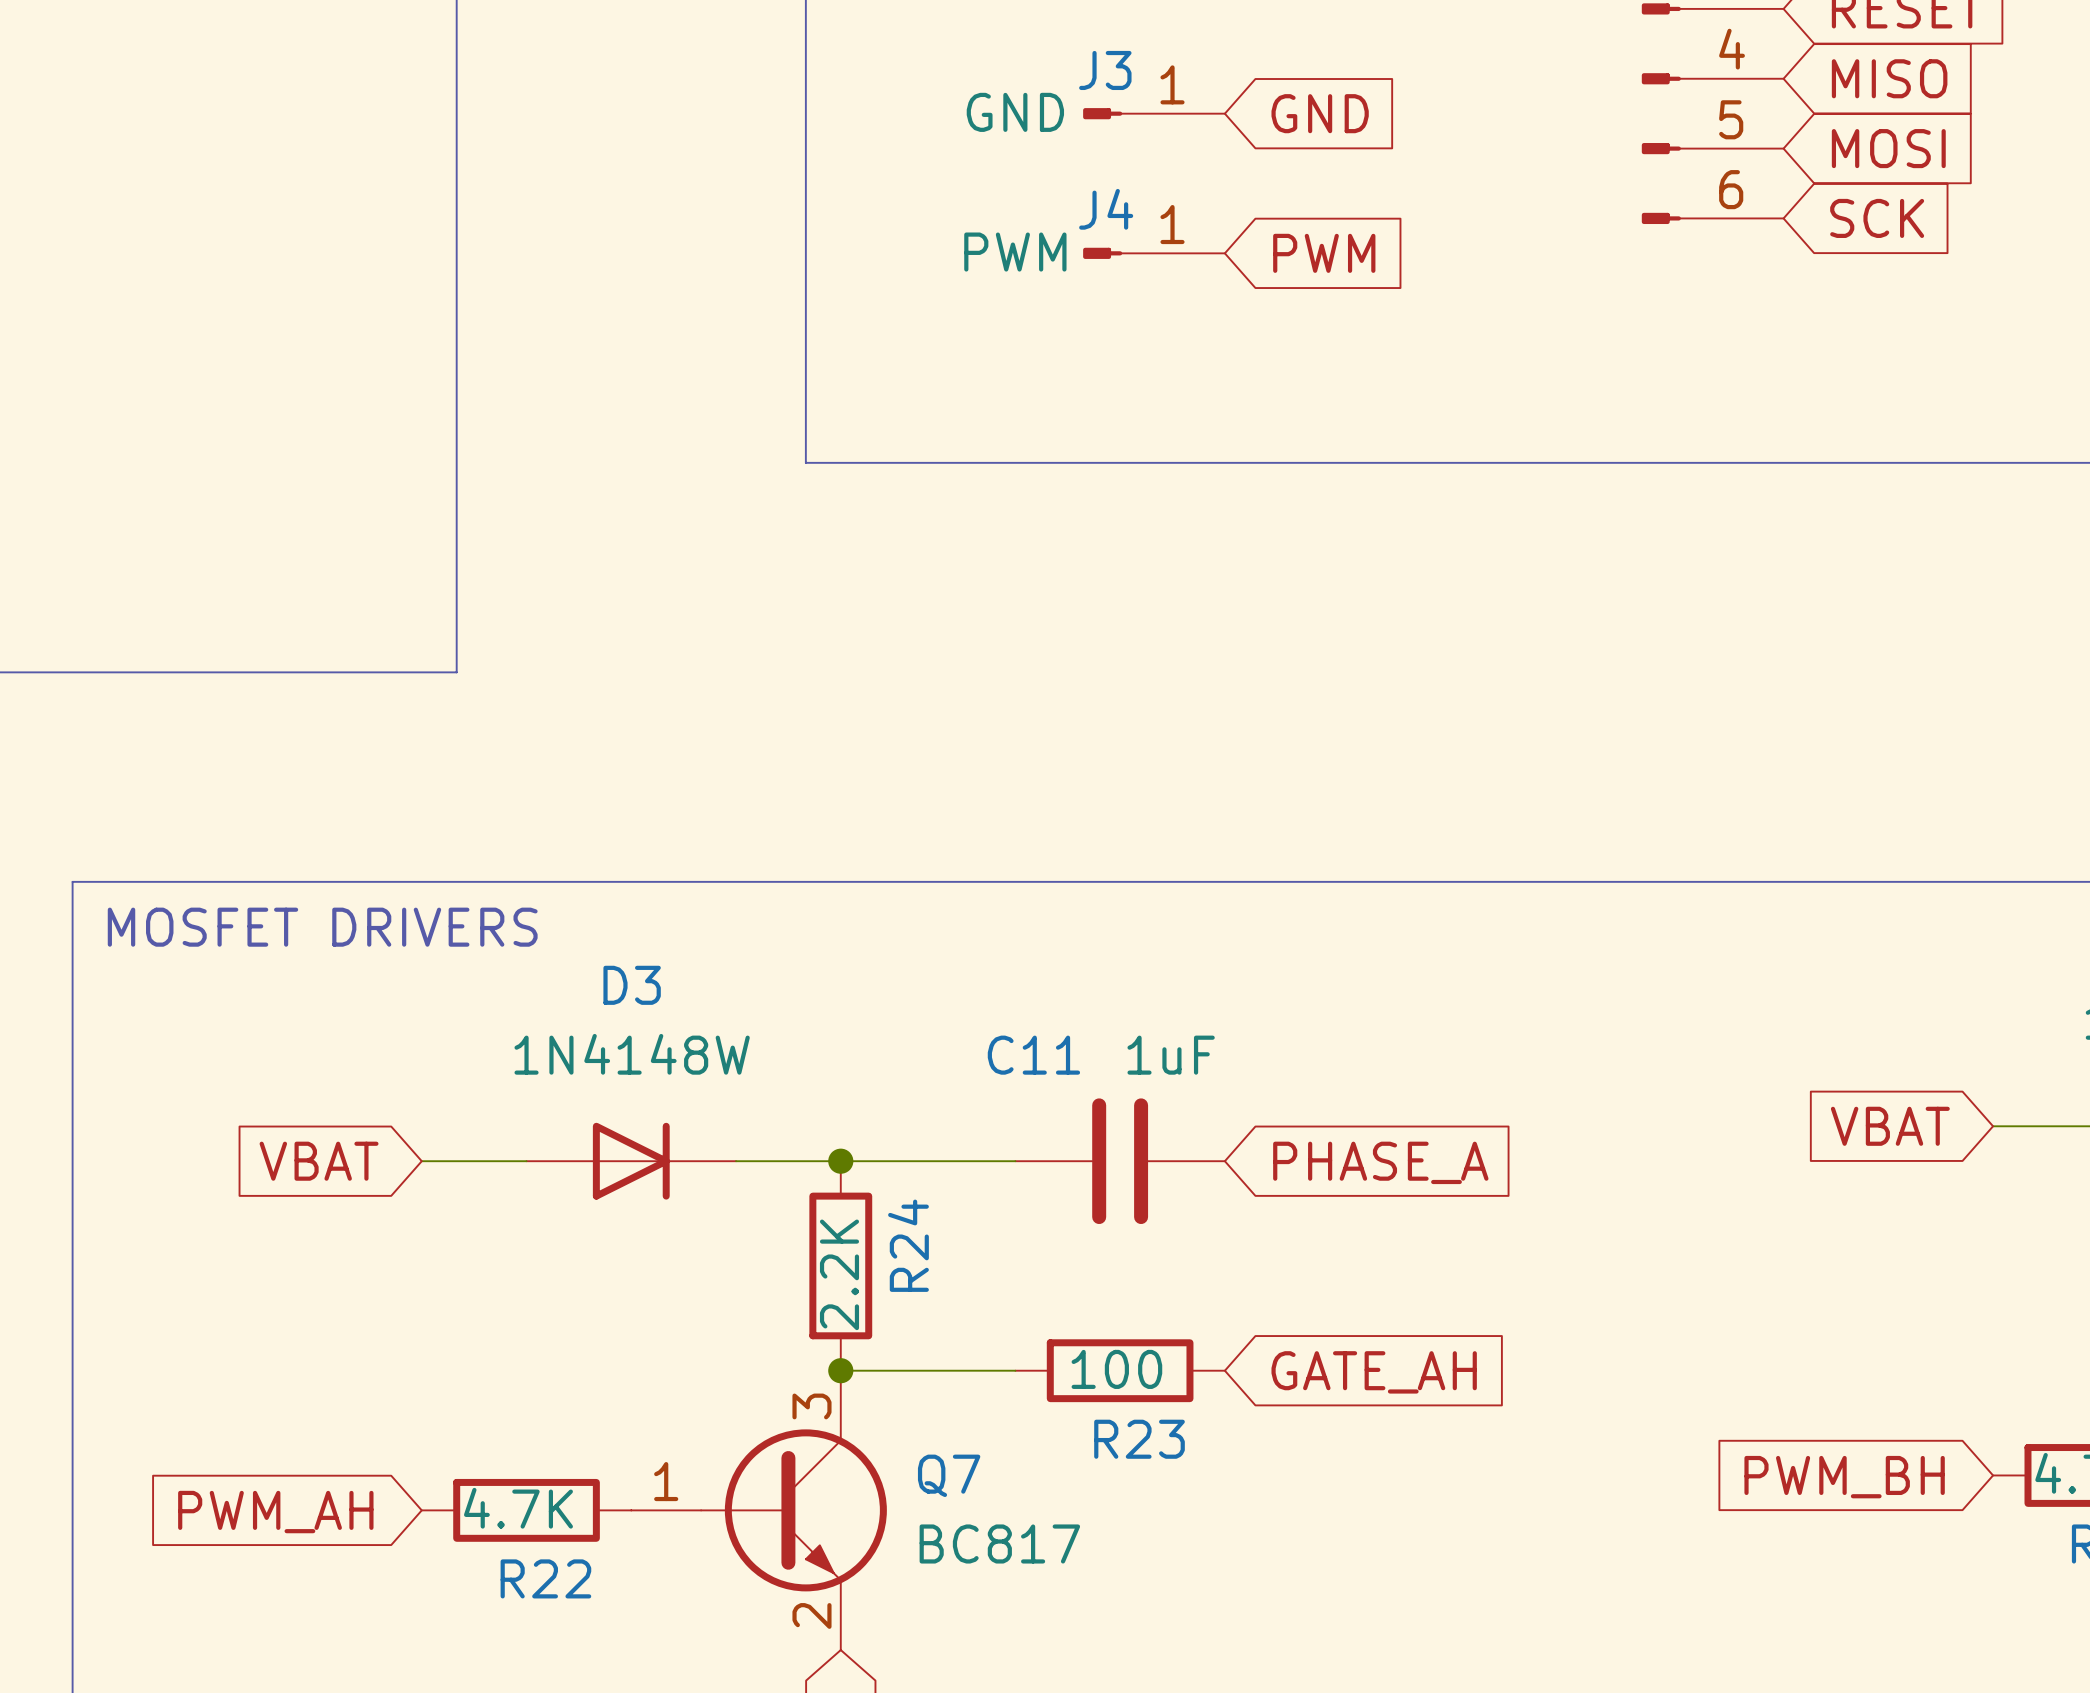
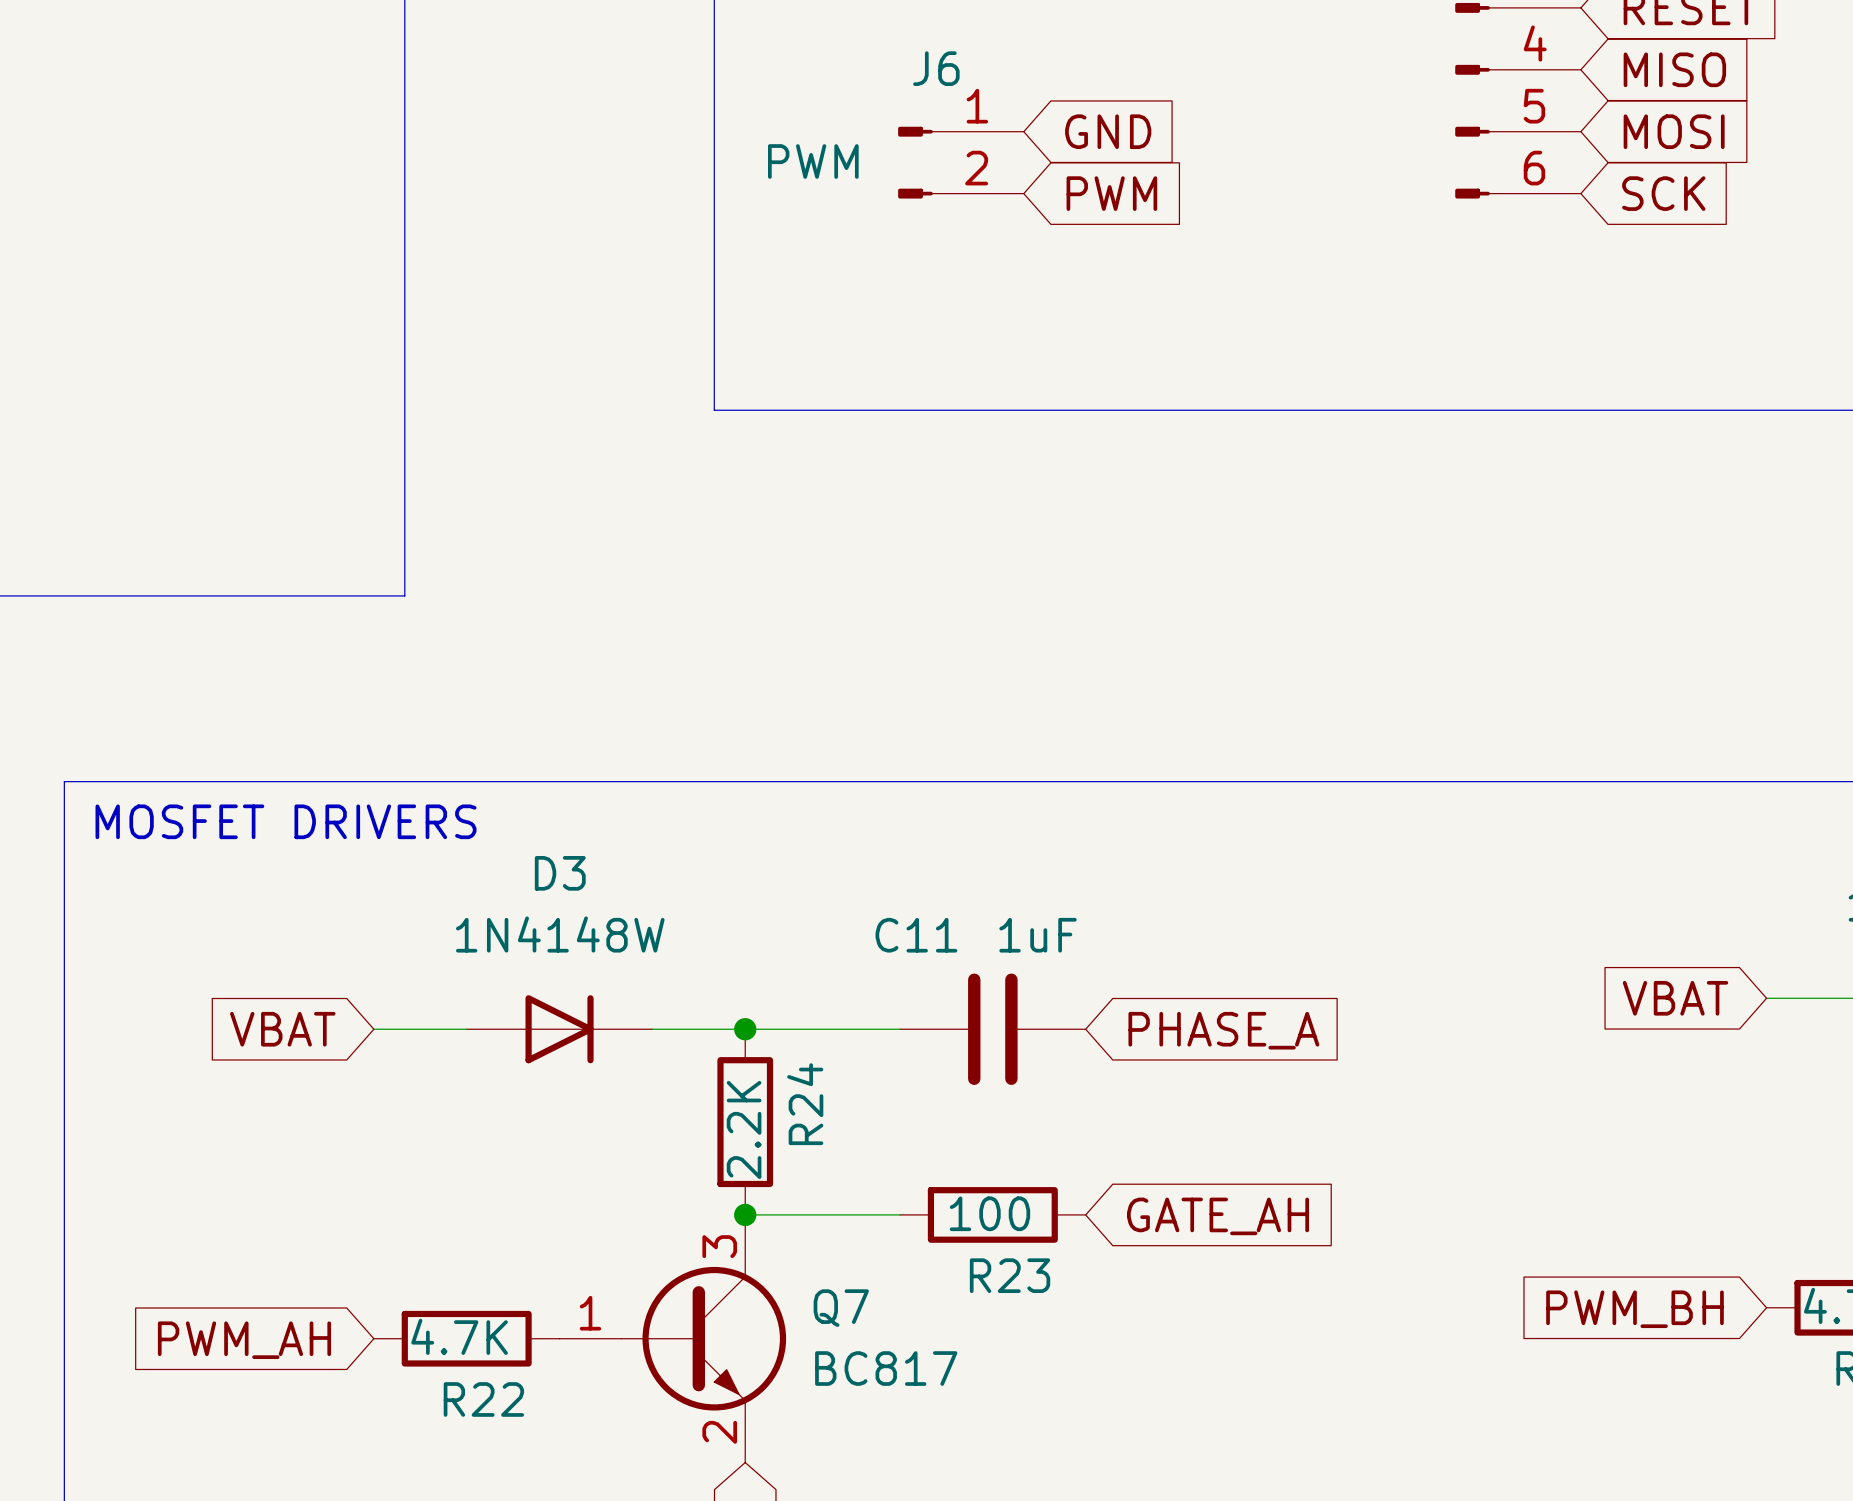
J3: GND (1154, 113) -> none
global label position: GND (1320, 113) -> GND (1108, 131)
J6: none -> PWM (960, 162)
J4: PWM (1154, 253) -> none
global label position: PWM (1324, 253) -> PWM (1111, 193)

